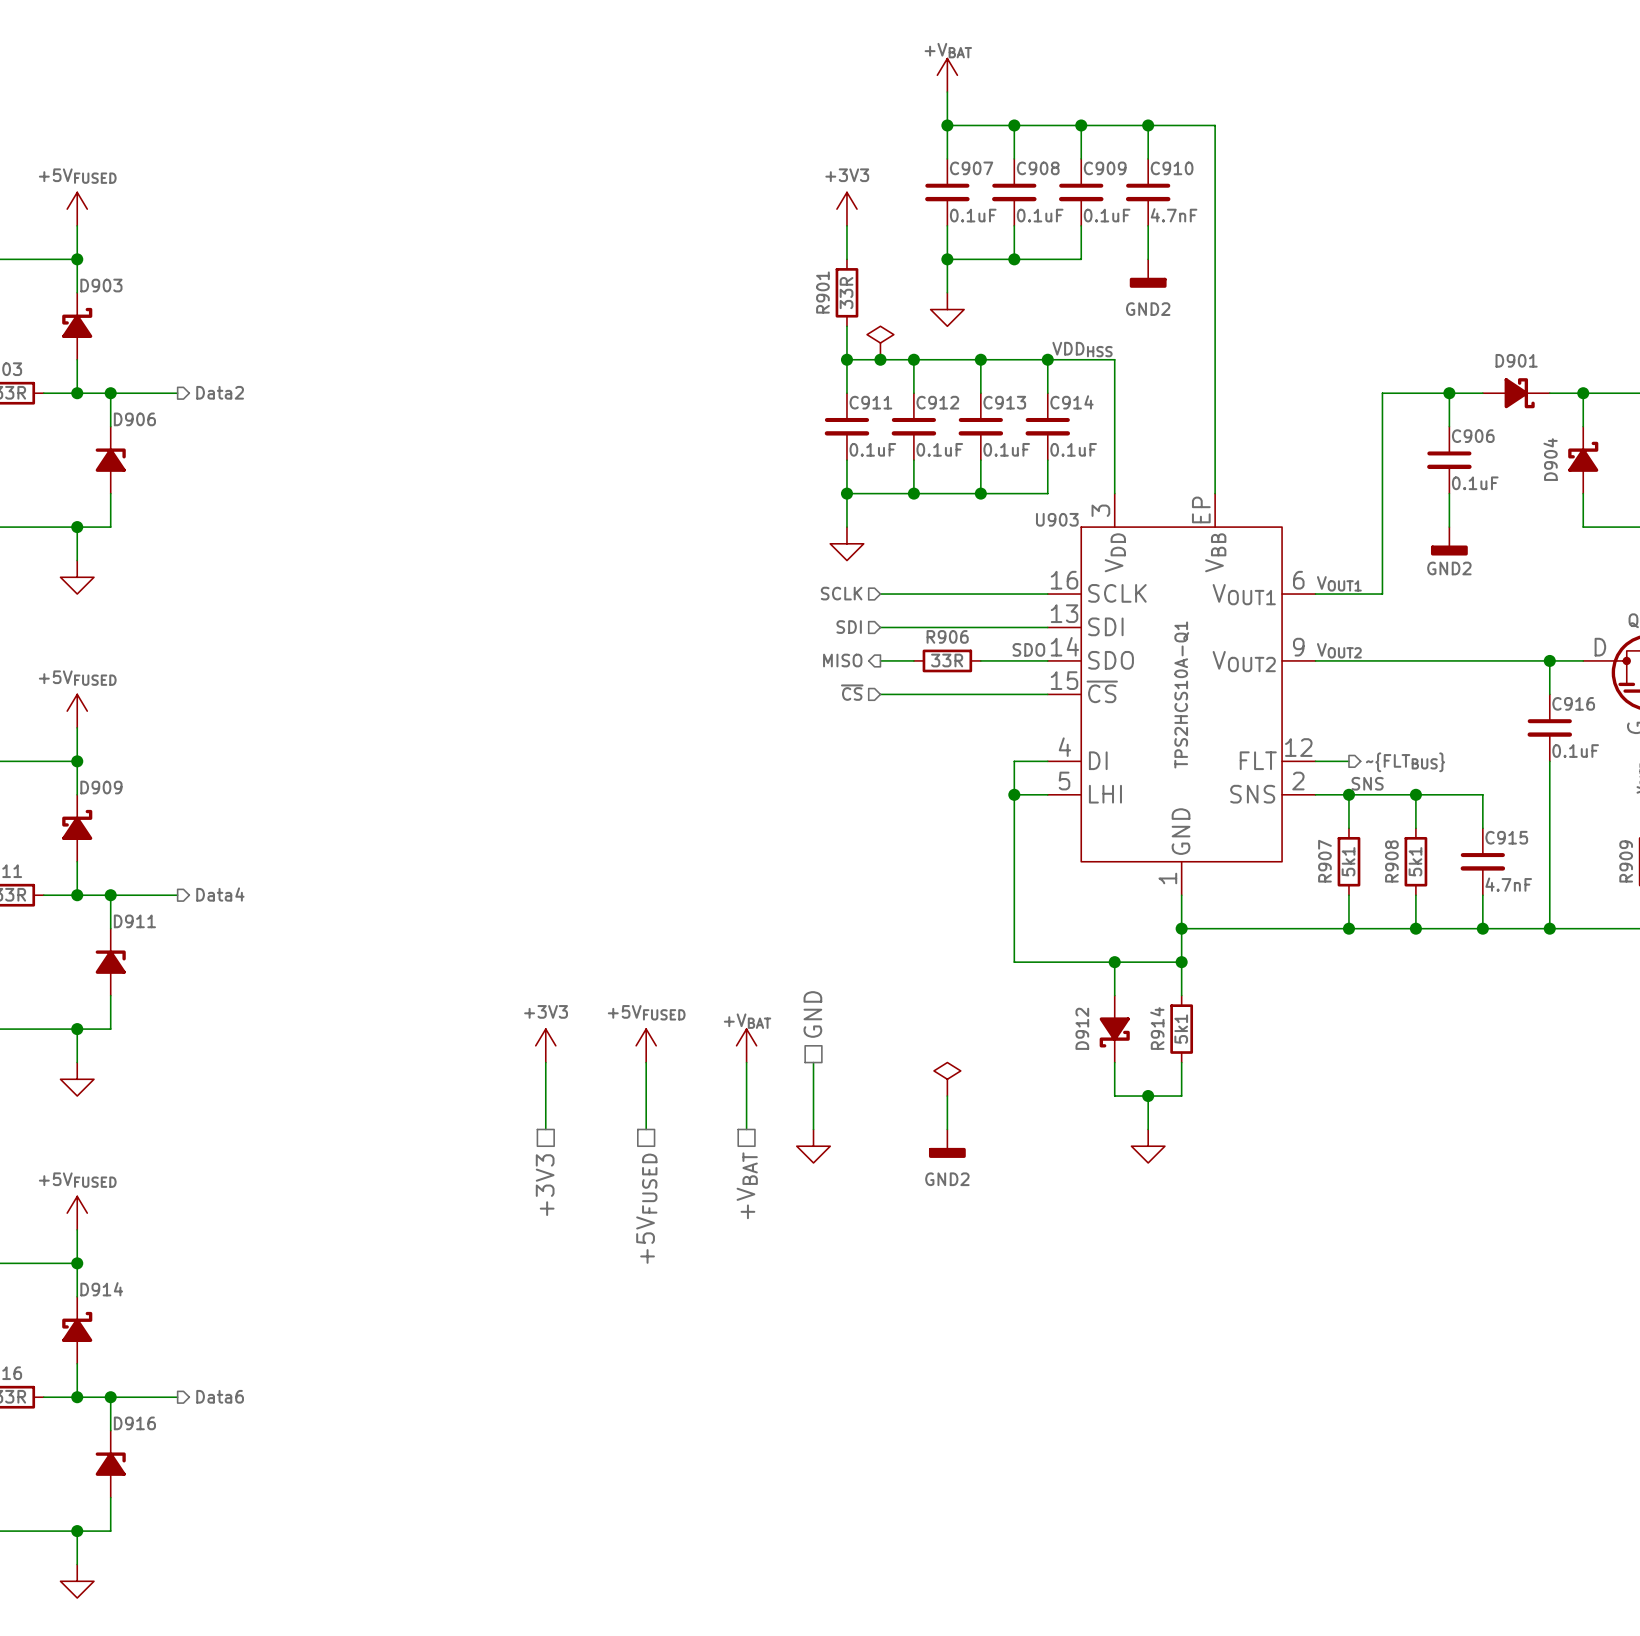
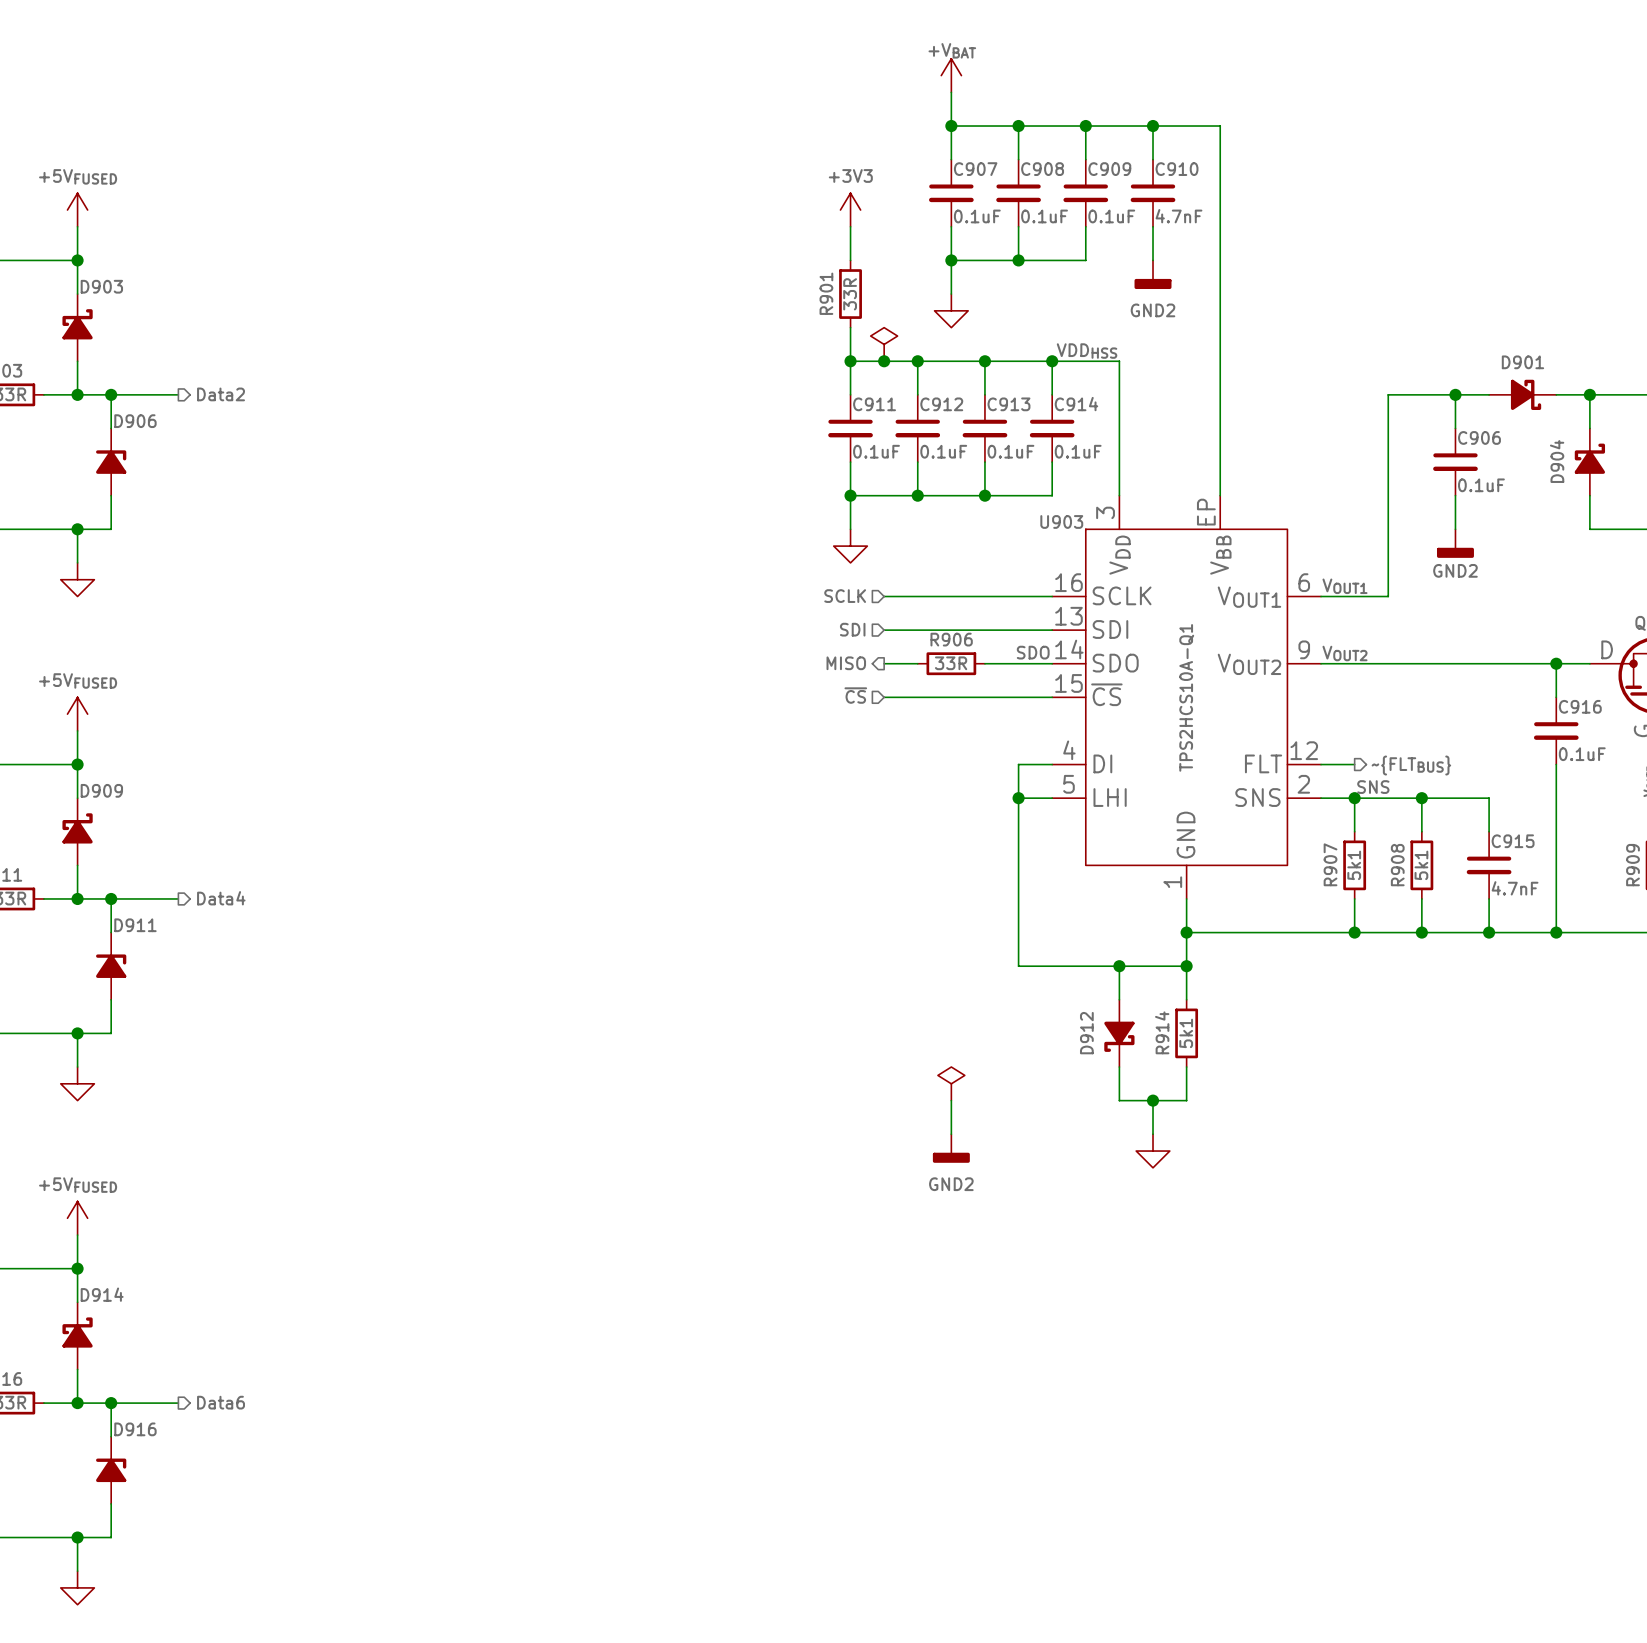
hierarchical label: GND (812, 1014) -> none
power symbol: +3V3 (545, 1045) -> none
power symbol: +5VFUSED (646, 1045) -> none
power symbol: +VBAT (746, 1045) -> none
wire: (545, 1062) (545, 1129) -> none
wire: (646, 1062) (646, 1129) -> none
wire: (746, 1062) (746, 1129) -> none
wire: (813, 1062) (813, 1129) -> none
power symbol: (813, 1146) -> none
hierarchical label: +3V3 (545, 1185) -> none
hierarchical label: +VBAT (747, 1185) -> none
hierarchical label: +5VFUSED (646, 1208) -> none

